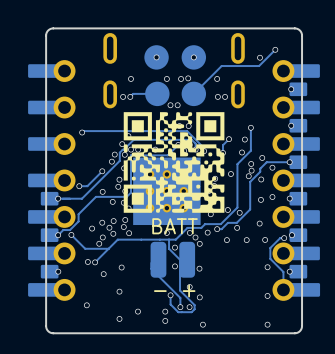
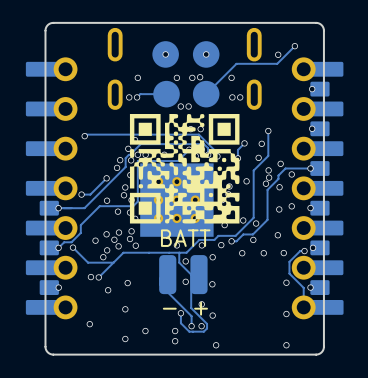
via: (195, 237) -> none

